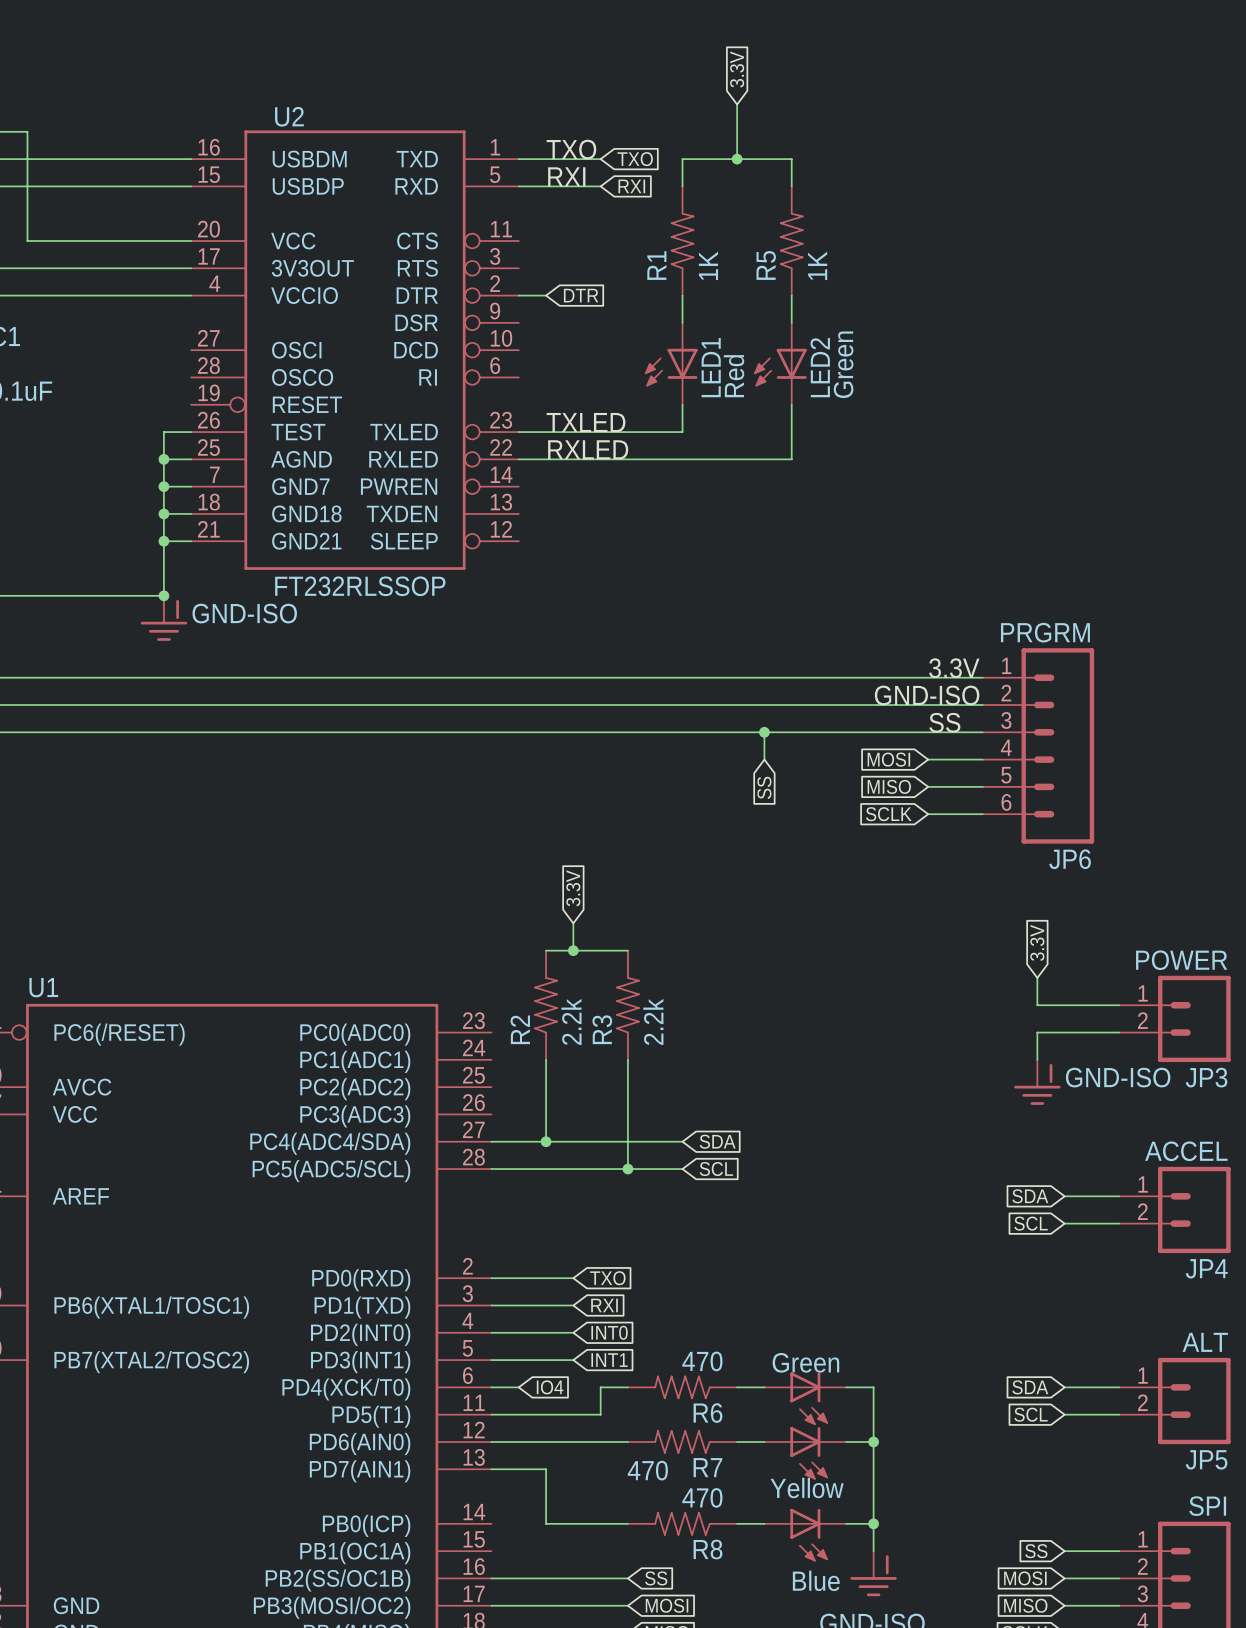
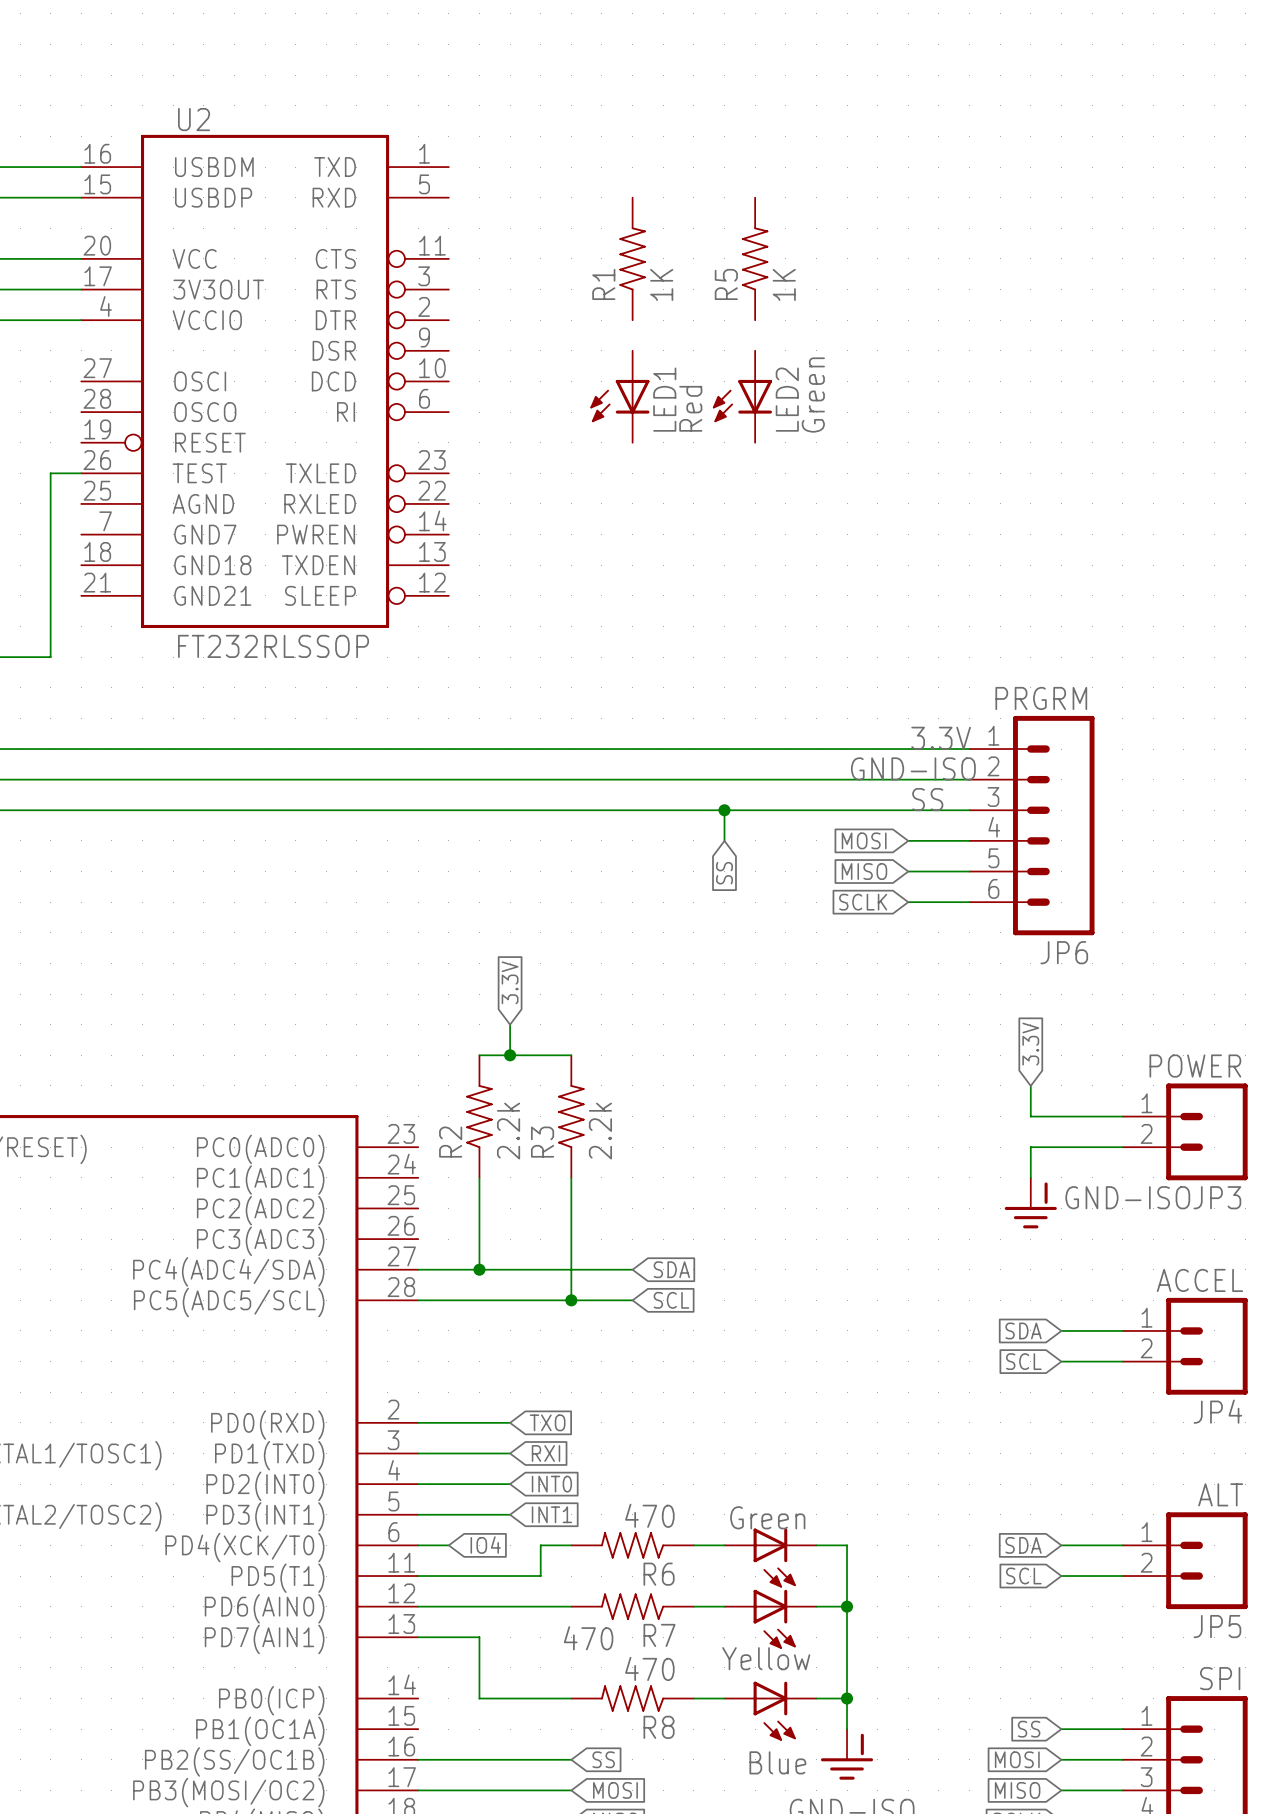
global label: 3.3V (737, 69) -> none
wire: (737, 104) (737, 159) -> none
label: TXO (571, 149) -> none
wire: (518, 159) (600, 159) -> none
global label: TXO (635, 159) -> none
junction: (737, 159) -> none
label: RXI (566, 176) -> none
wire: (518, 186) (600, 186) -> none
global label: RXI (631, 186) -> none
wire: (682, 186) (682, 159) (791, 159) (791, 186) -> none
wire: (518, 295) (546, 295) -> none
global label: DTR (581, 295) -> none
wire: (682, 295) (682, 322) -> none
wire: (791, 295) (791, 322) -> none
wire: (682, 404) (682, 432) (518, 432) -> none
wire: (791, 404) (791, 459) (518, 459) -> none
label: TXLED (586, 422) -> none
label: RXLED (588, 449) -> none
wire: (163, 459) (191, 459) -> none
junction: (163, 459) -> none
wire: (163, 486) (191, 486) -> none
junction: (163, 486) -> none
wire: (163, 513) (191, 513) -> none
junction: (163, 513) -> none
wire: (163, 541) (191, 541) -> none
junction: (163, 541) -> none
junction: (163, 595) -> none
power symbol: GND-ISO (163, 618) -> none

